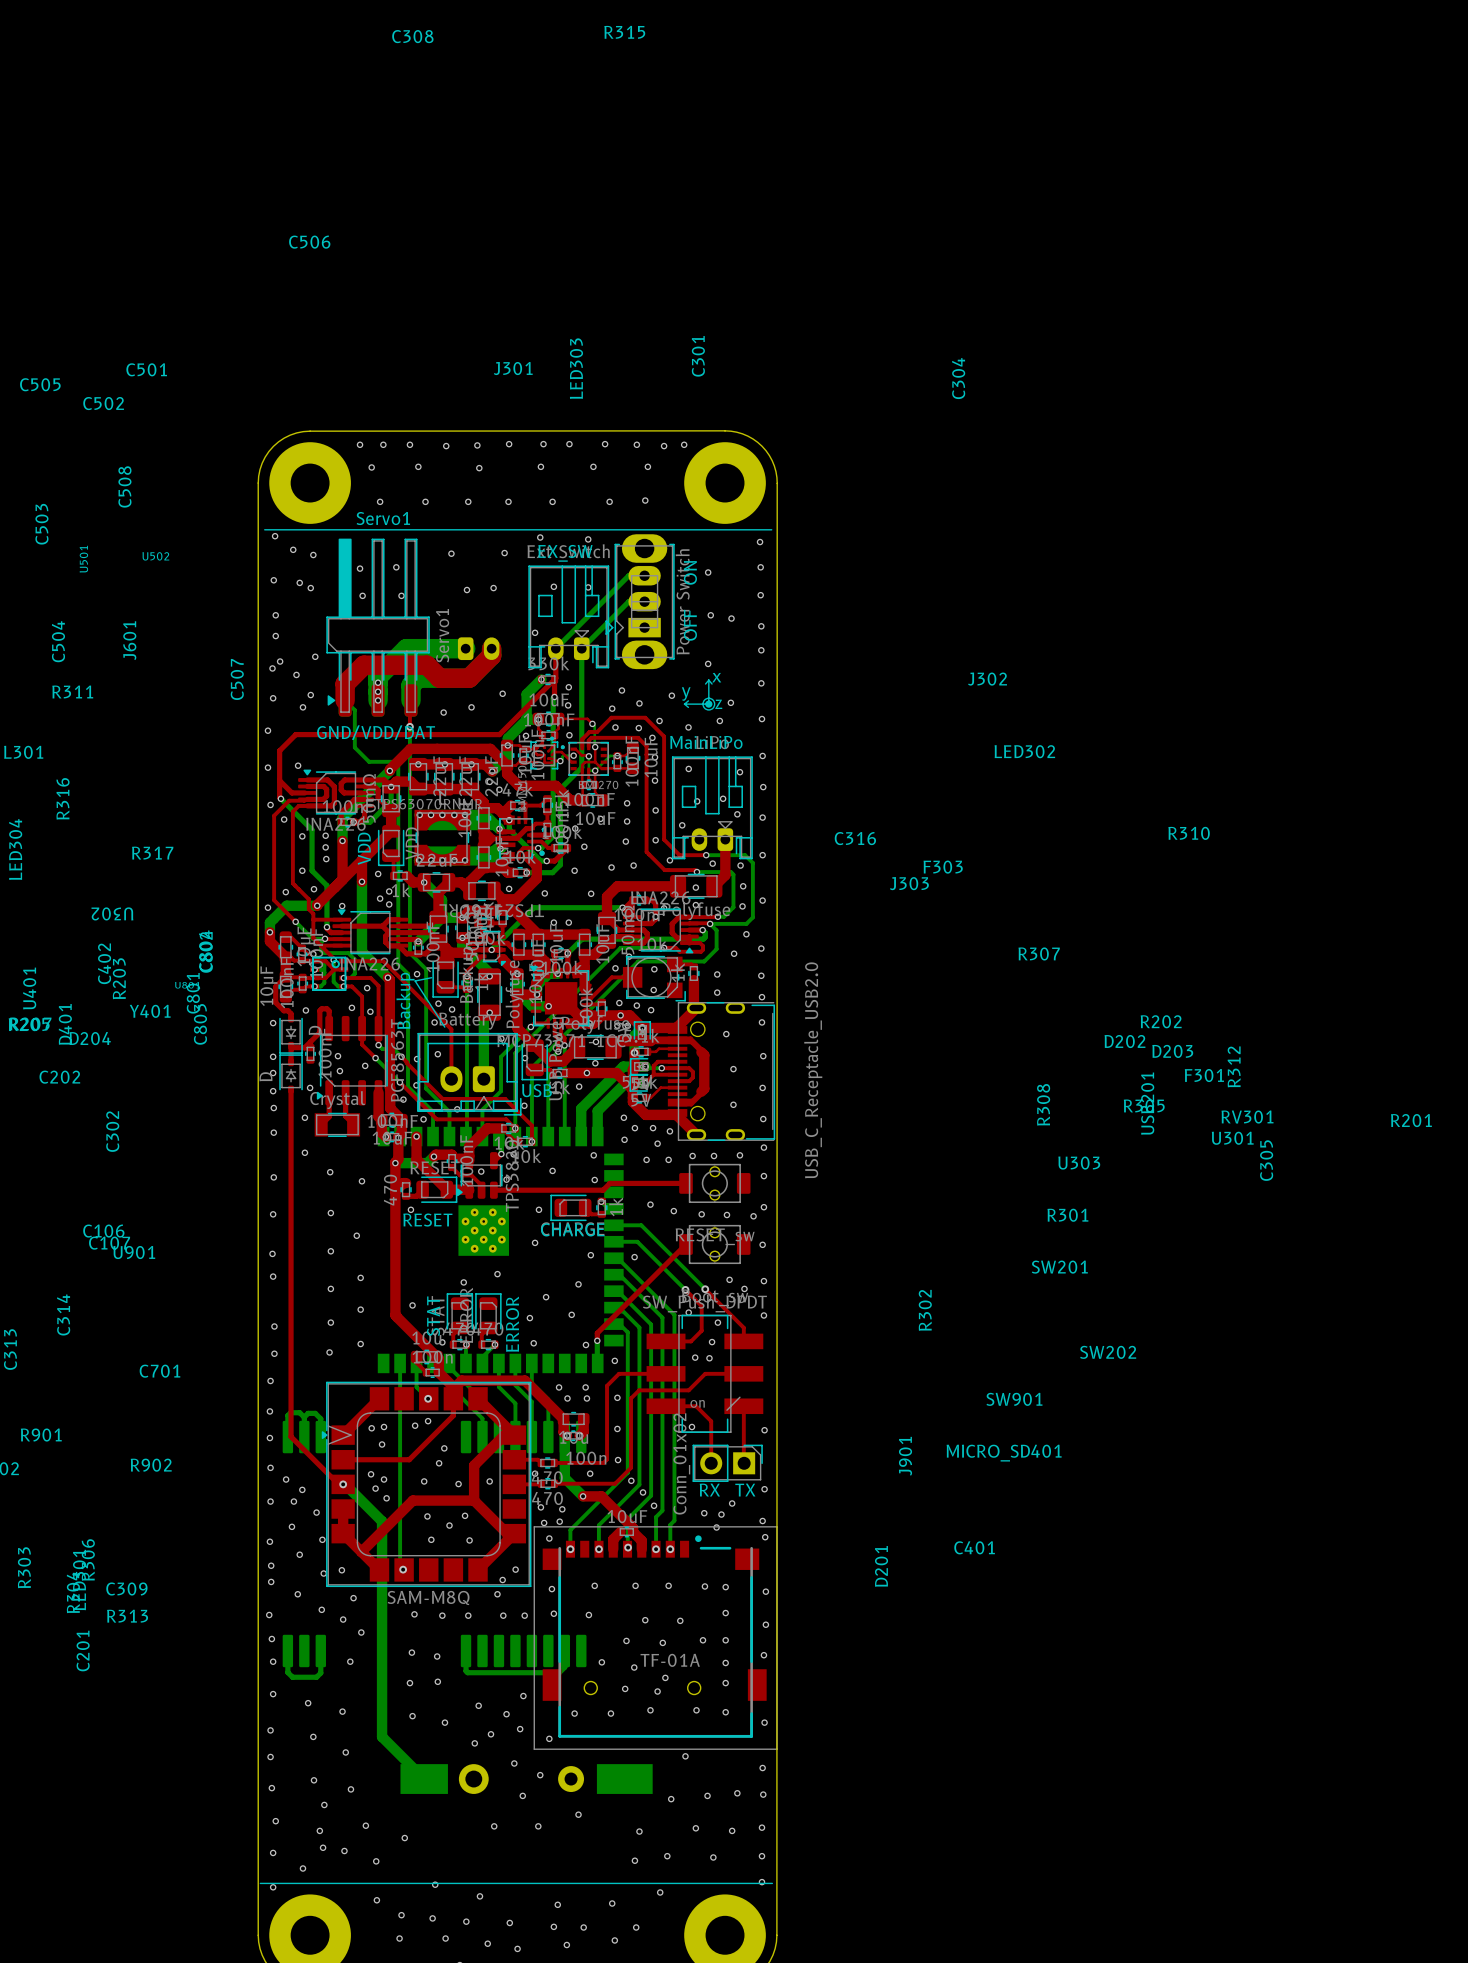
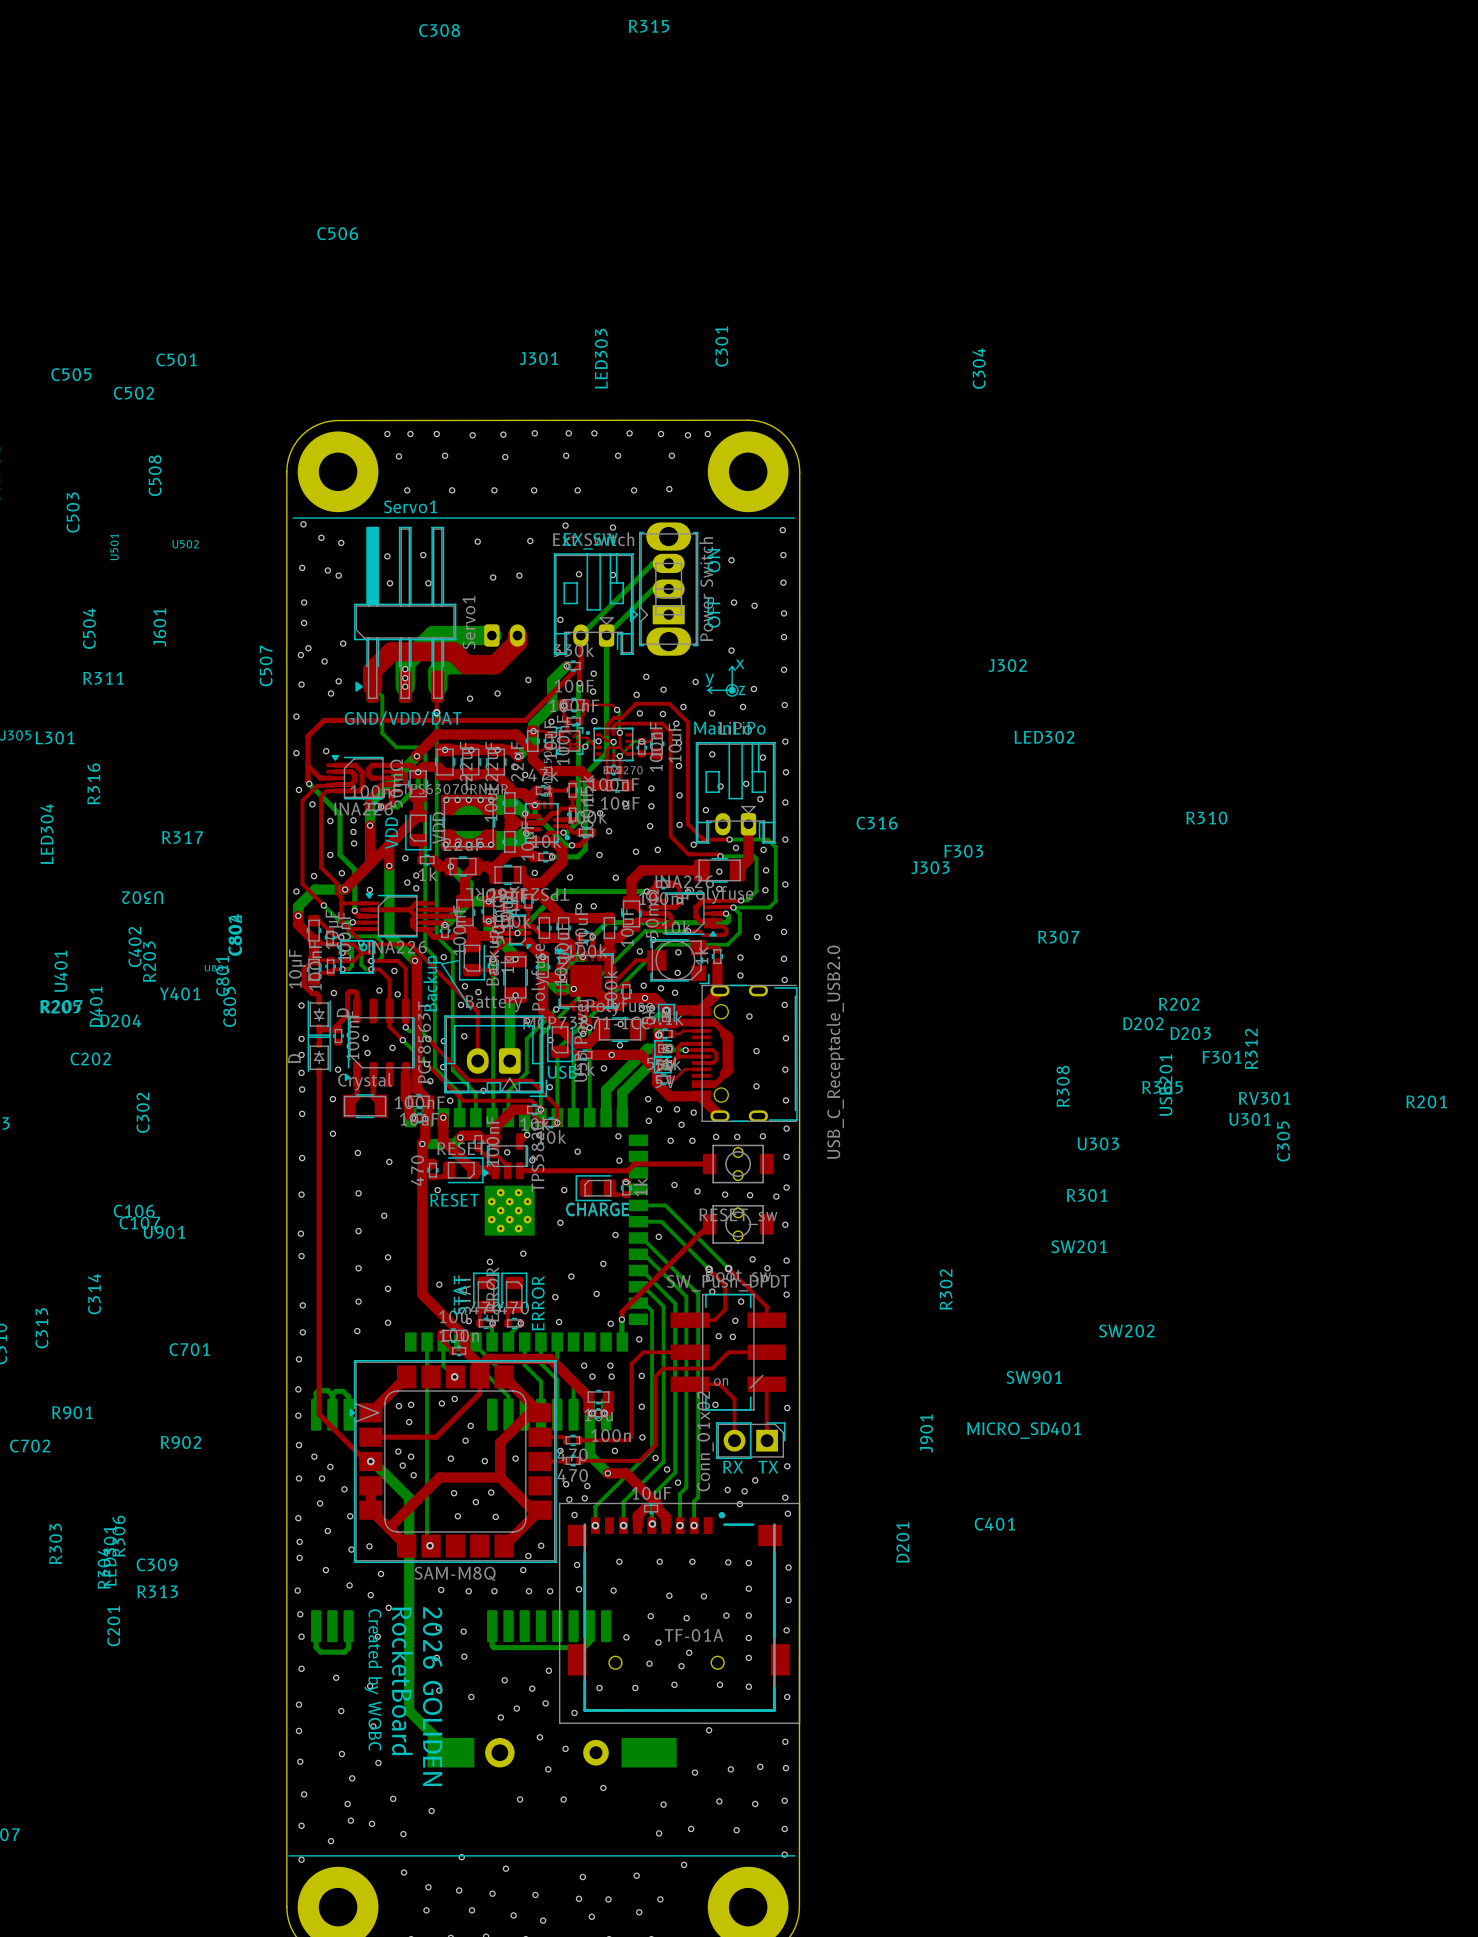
text: none -> Created by WOBC (373, 1680)
text: none -> RocketBoard (402, 1681)
text: none -> 2026 GOLIDEN (432, 1696)

